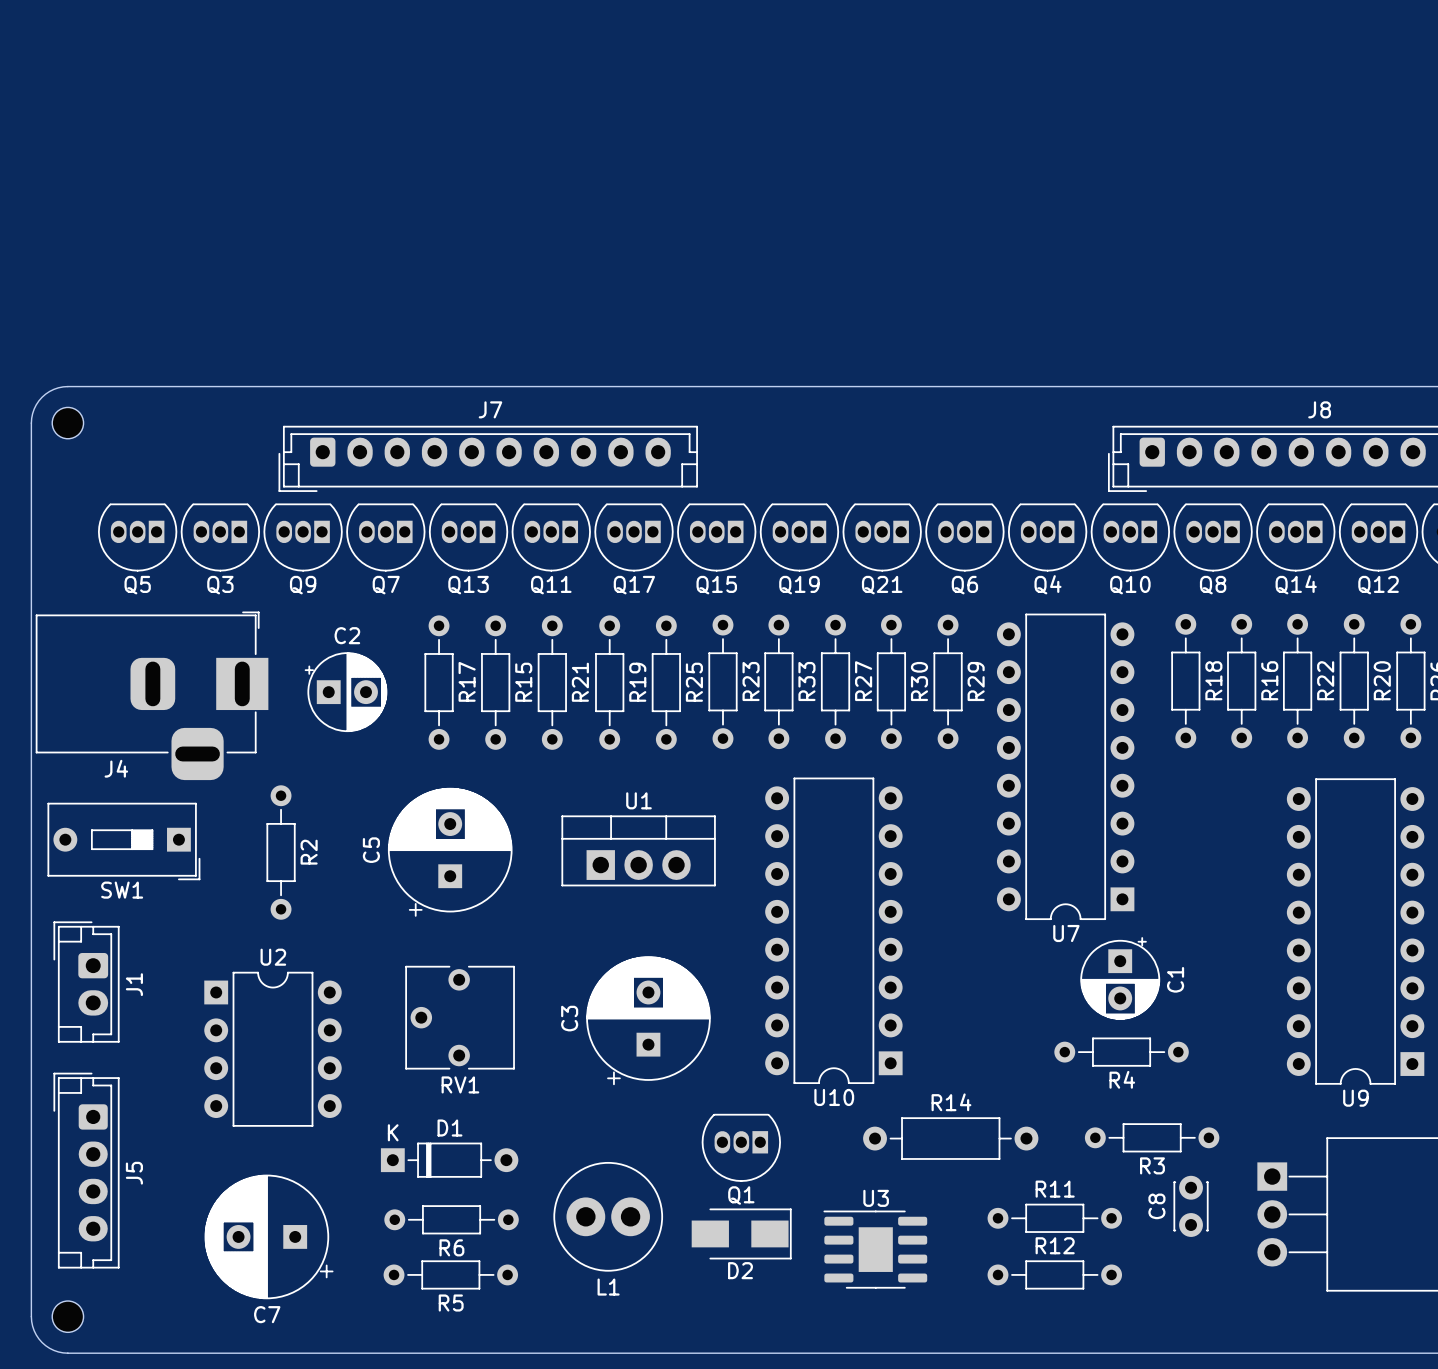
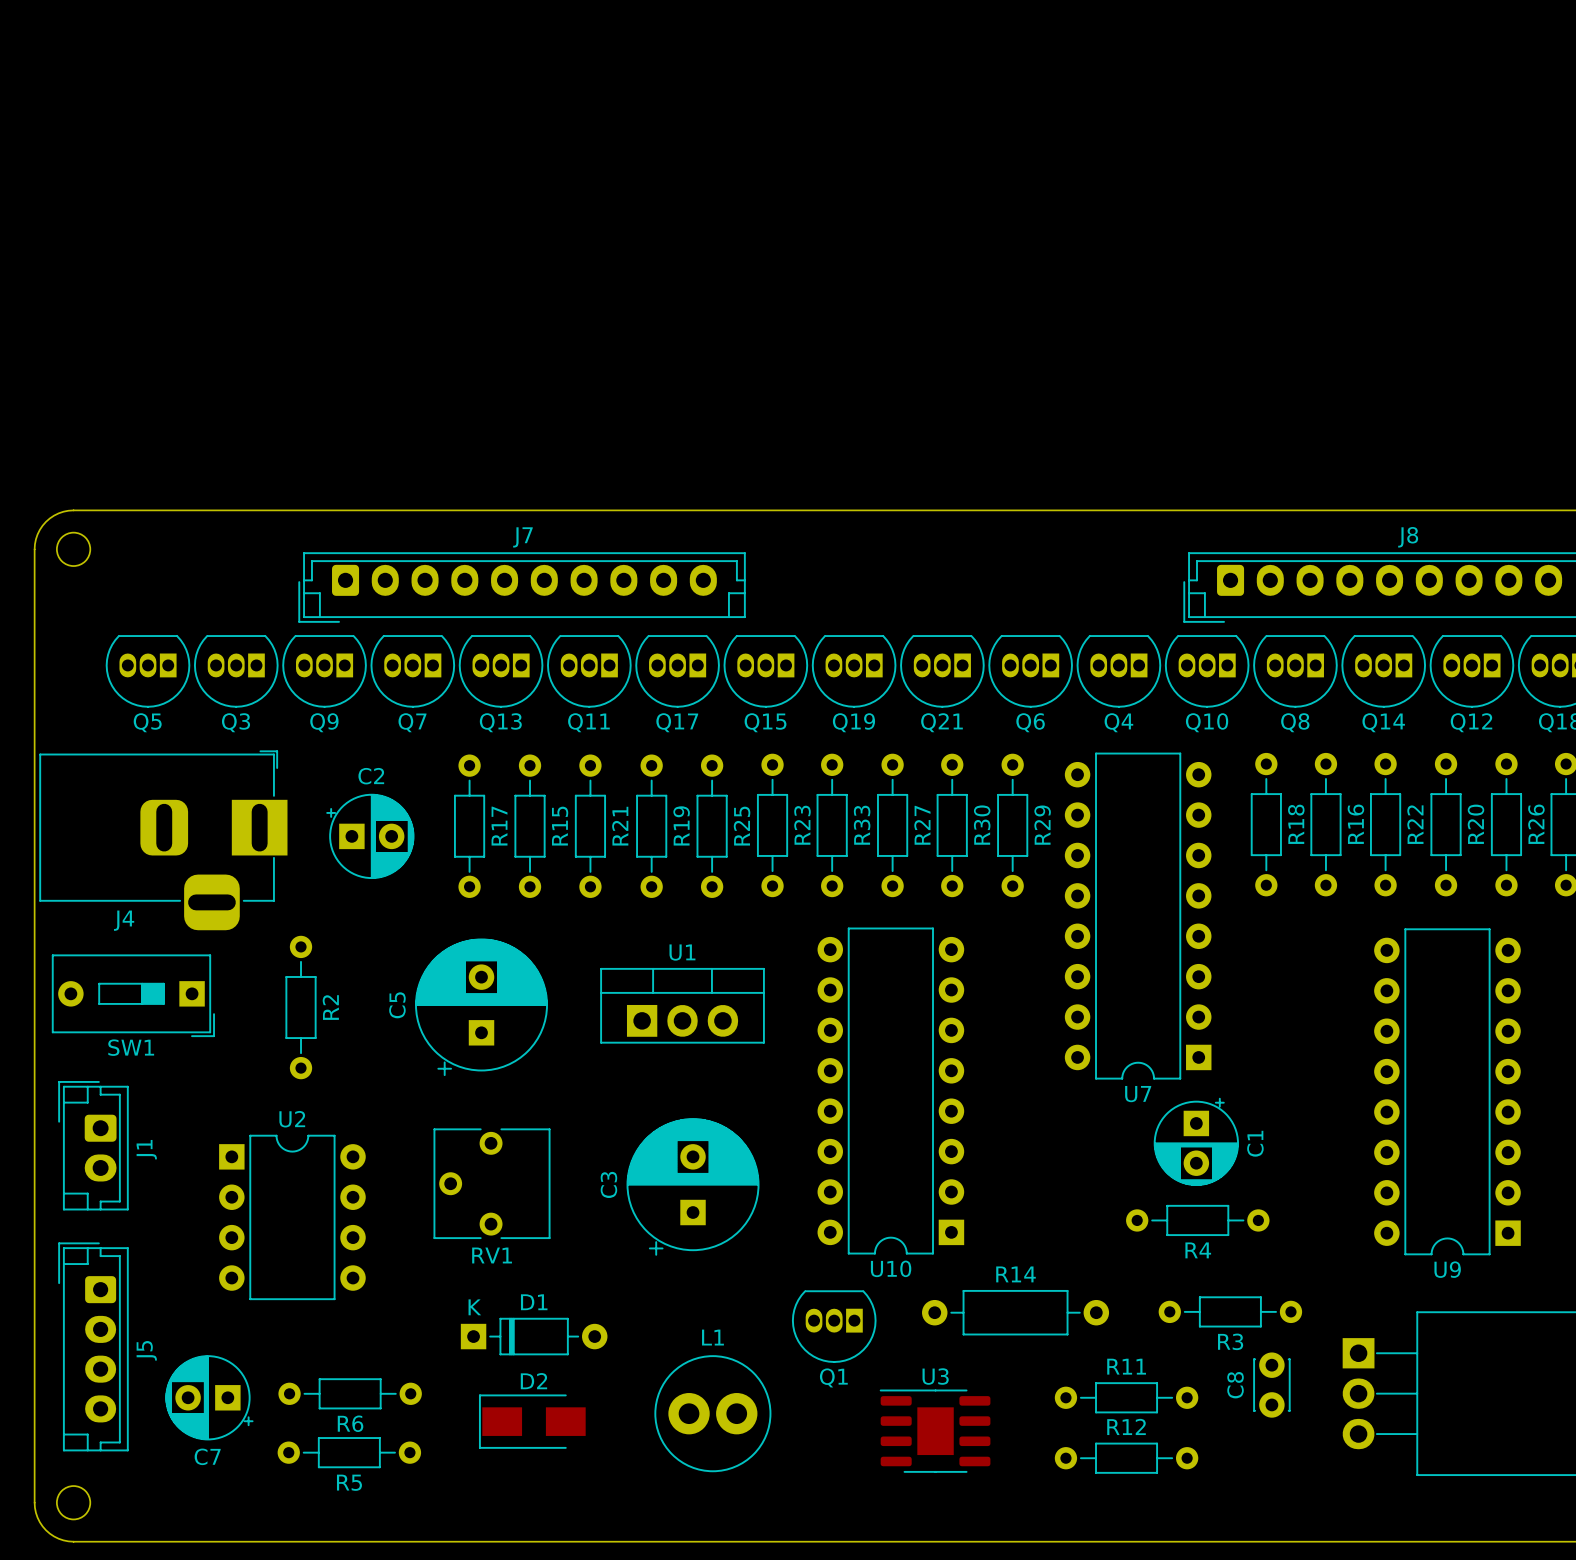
Q1 position: (741, 1147) -> (834, 1326)
D1 position: (449, 1160) -> (534, 1336)
C7 footprint: [204, 1174, 334, 1300] -> [165, 1355, 254, 1441]
L1 position: (608, 1216) -> (712, 1413)
R6 position: (451, 1219) -> (350, 1393)
D2 rotation: 0° (741, 1233) -> 180° (532, 1421)
D2 position: (741, 1233) -> (532, 1421)
R5 position: (450, 1274) -> (349, 1452)
L1 name position: L1 (608, 1287) -> L1 (712, 1337)

